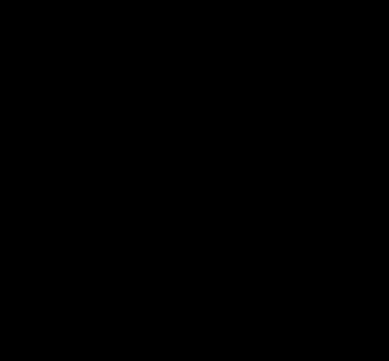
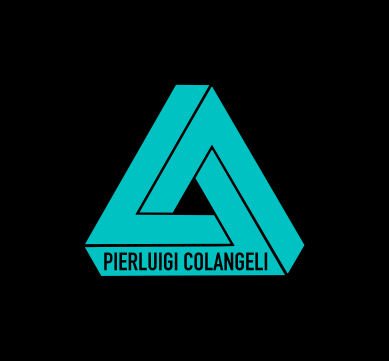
drawing: none -> [84, 84, 305, 276]

